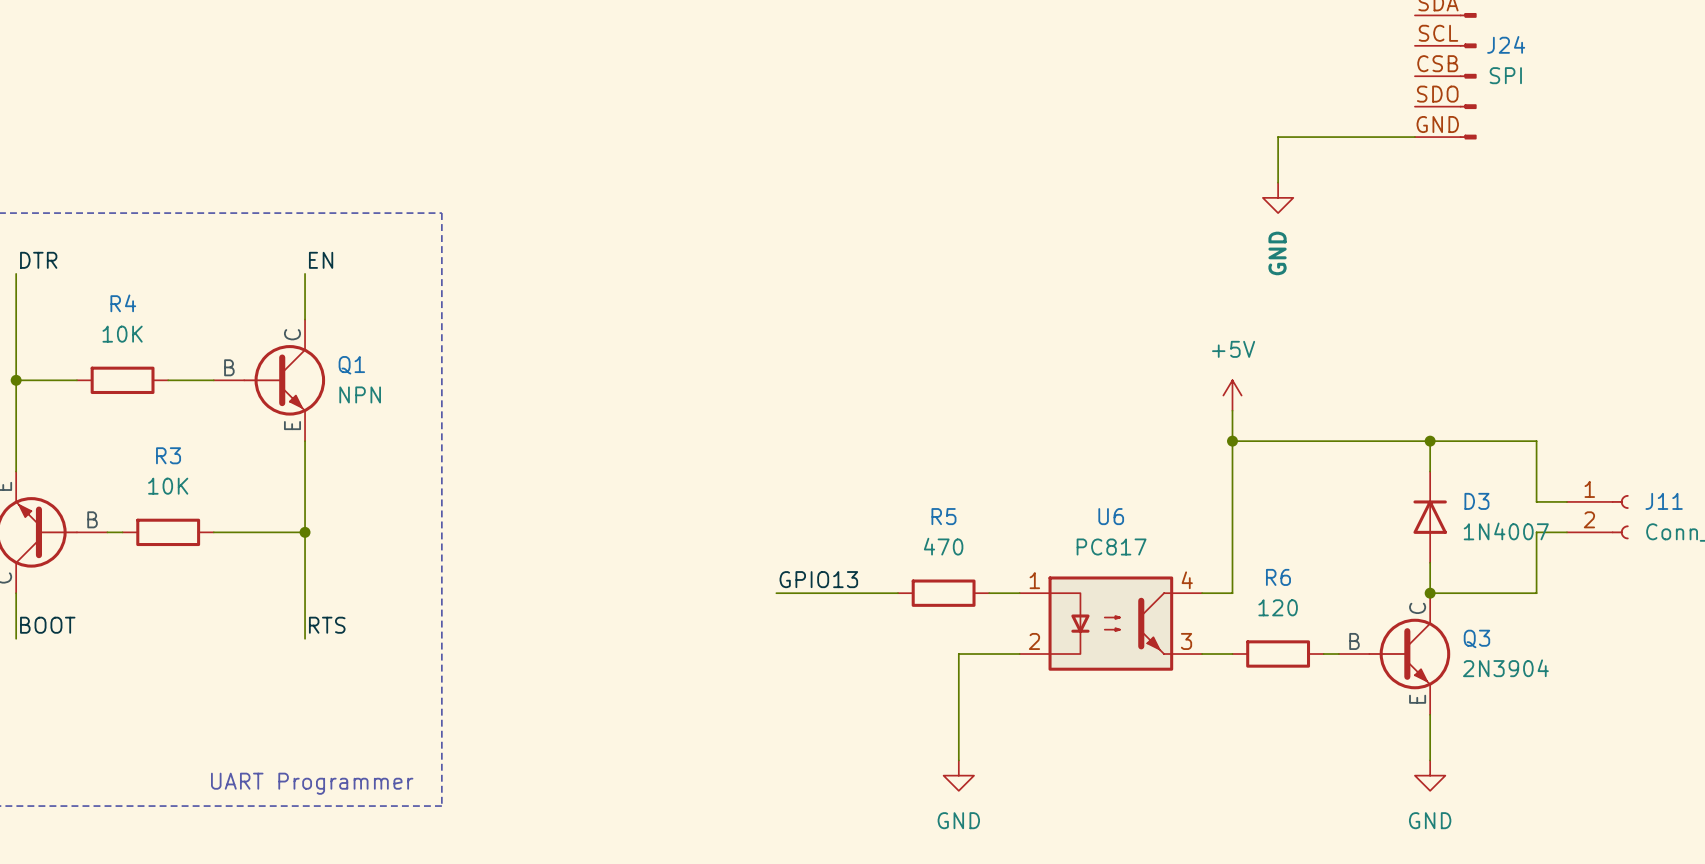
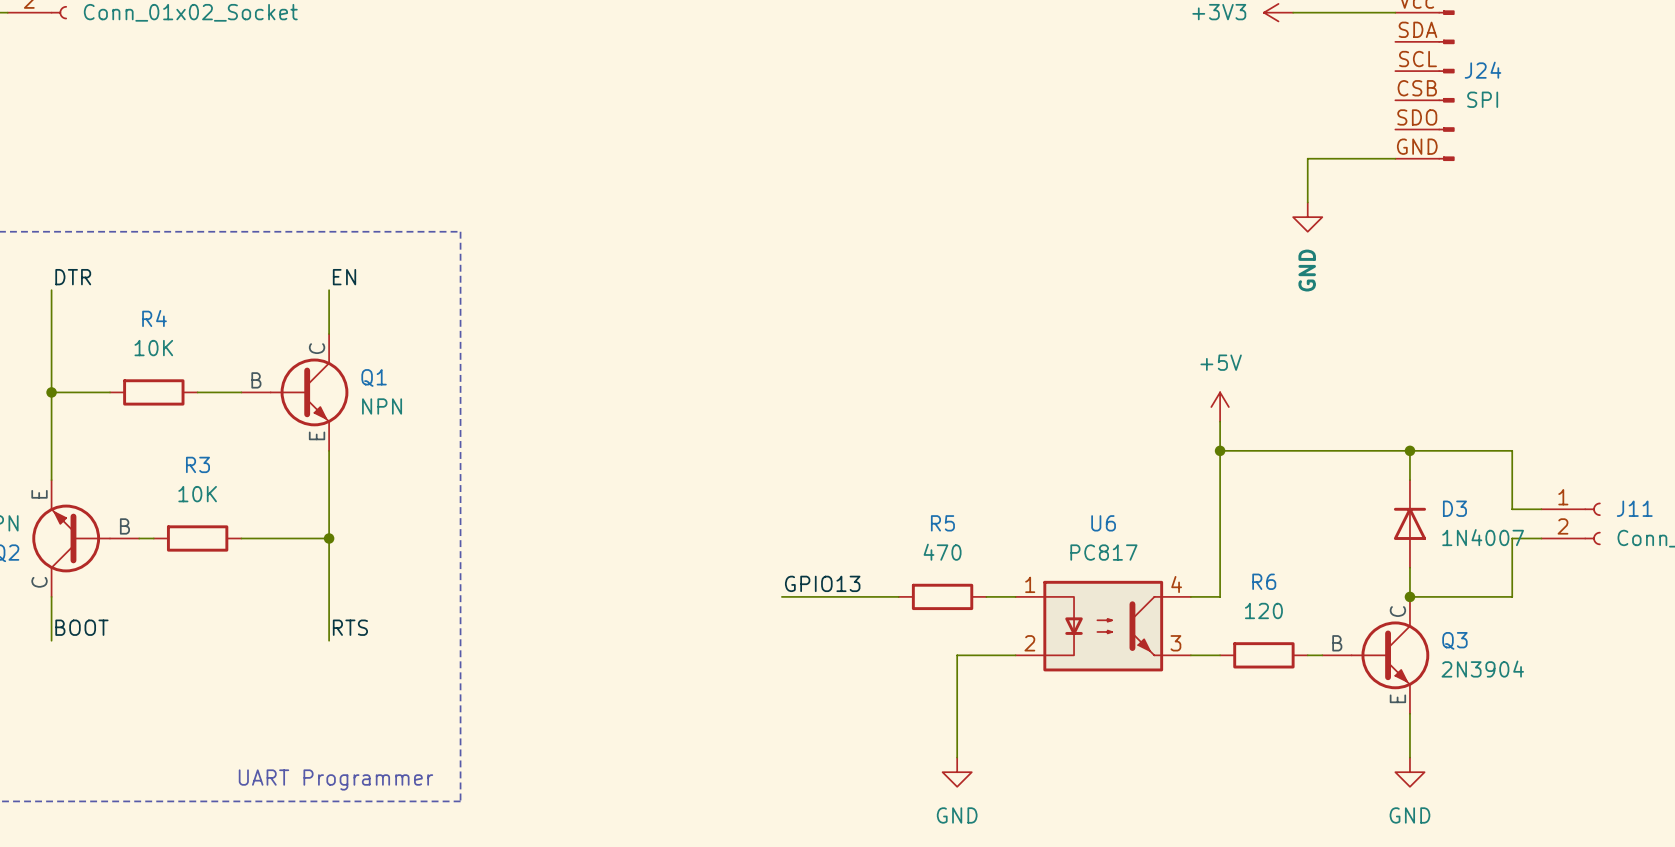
wire: (1323, 137) (1278, 137) (1278, 182) -> (1307, 158) (1307, 202)
power symbol position: GND (1278, 197) -> GND (1307, 217)

